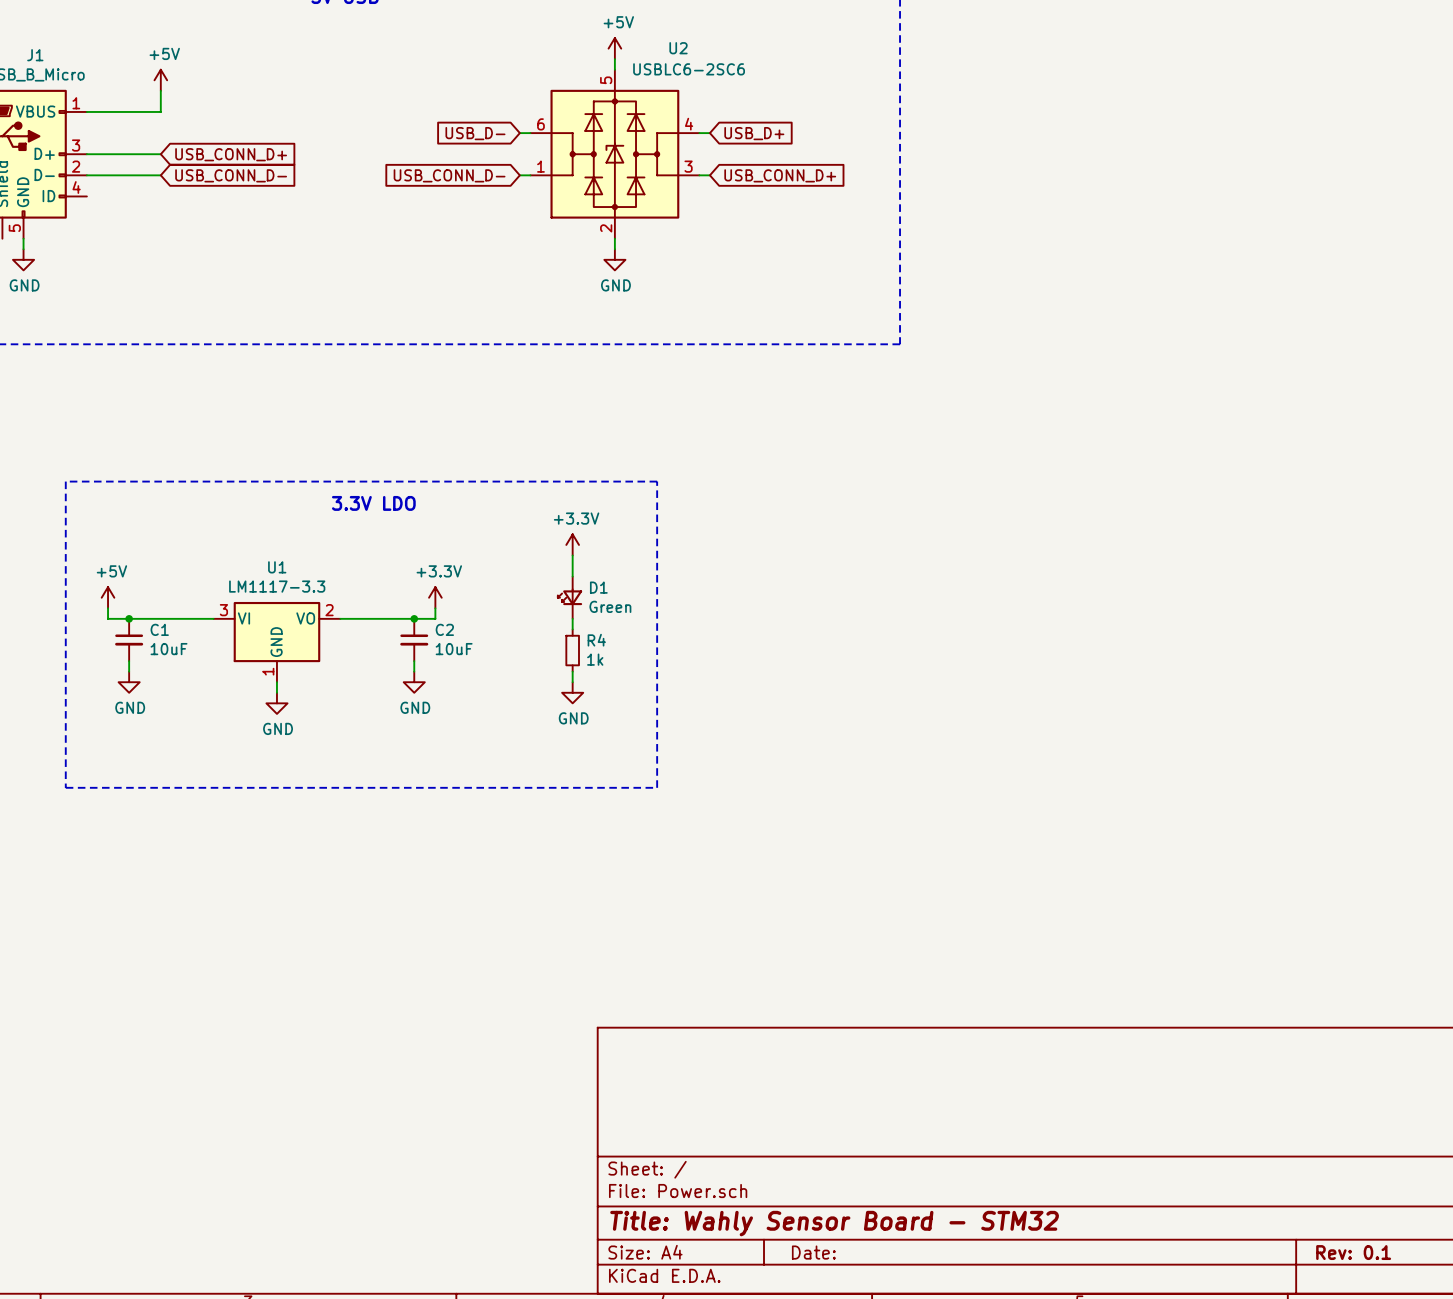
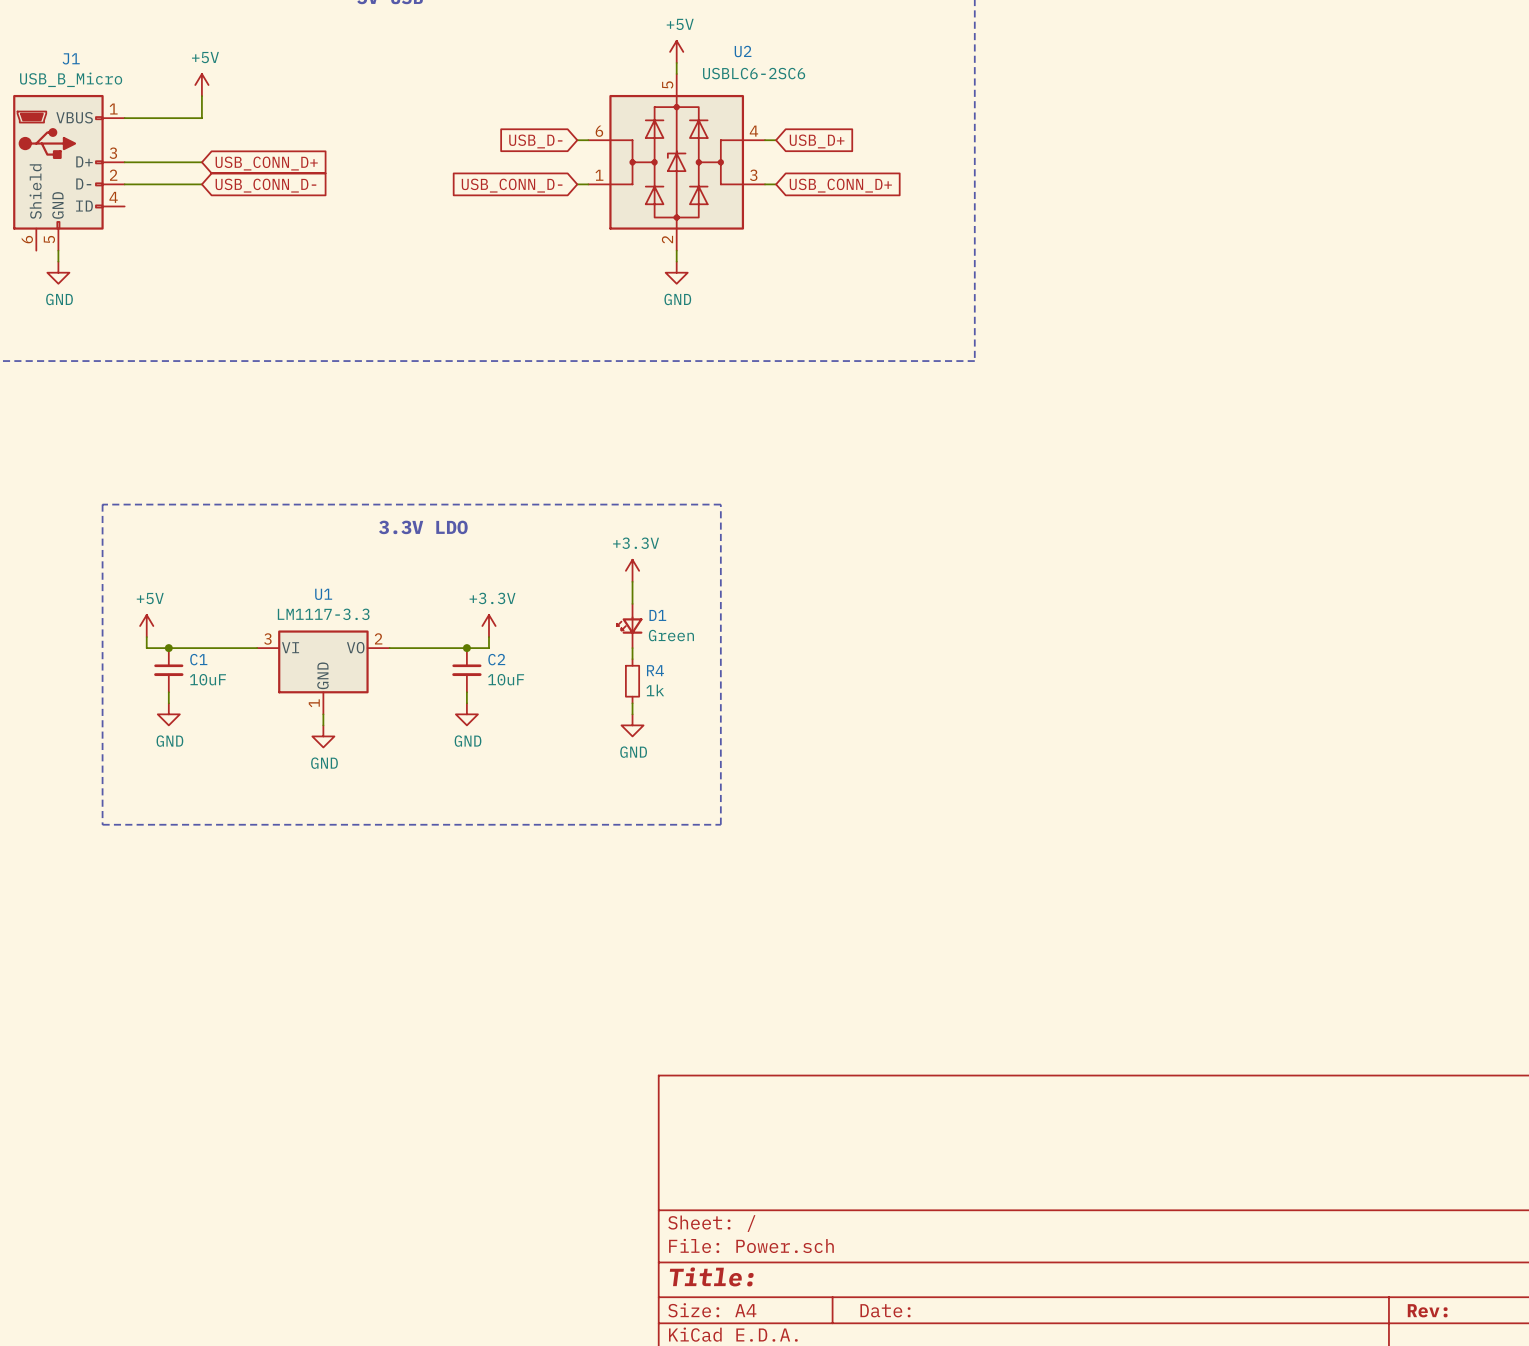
title block: Title: Wahly Sensor Board - STM32 (834, 1223) -> Title: (711, 1276)
title block: Rev: 0.1 (1353, 1252) -> Rev: (1427, 1310)

